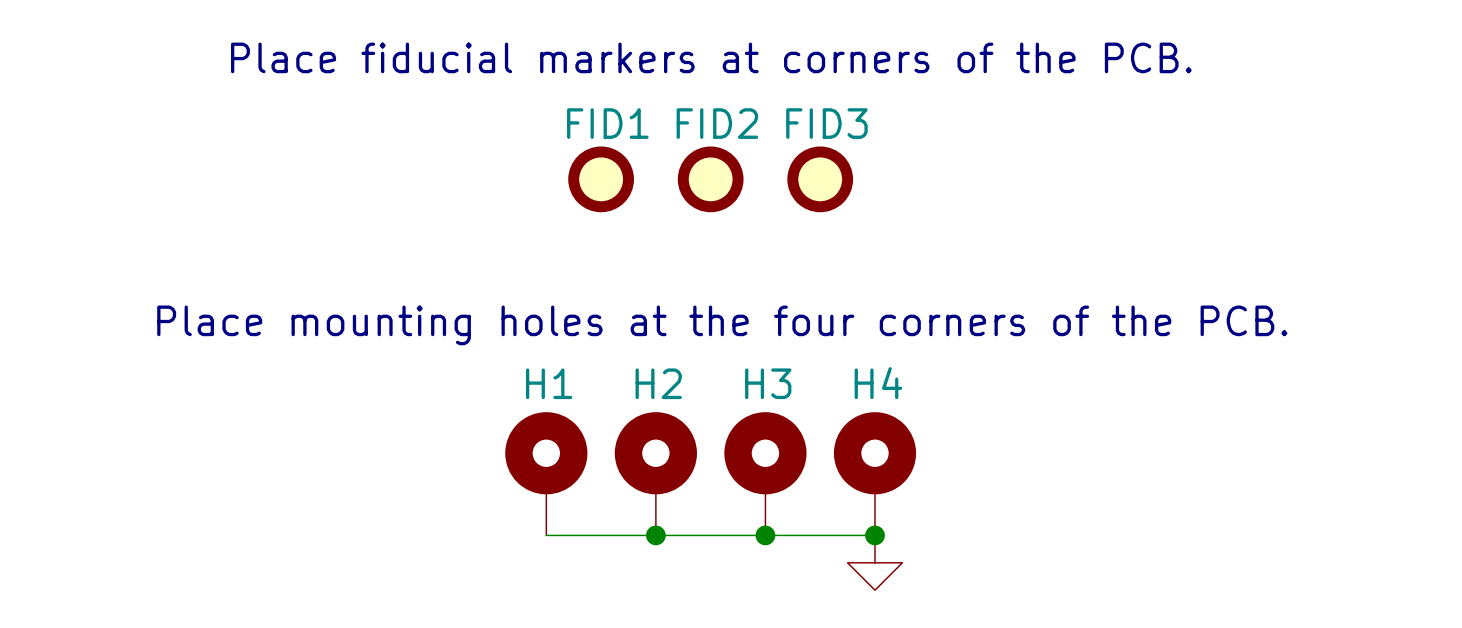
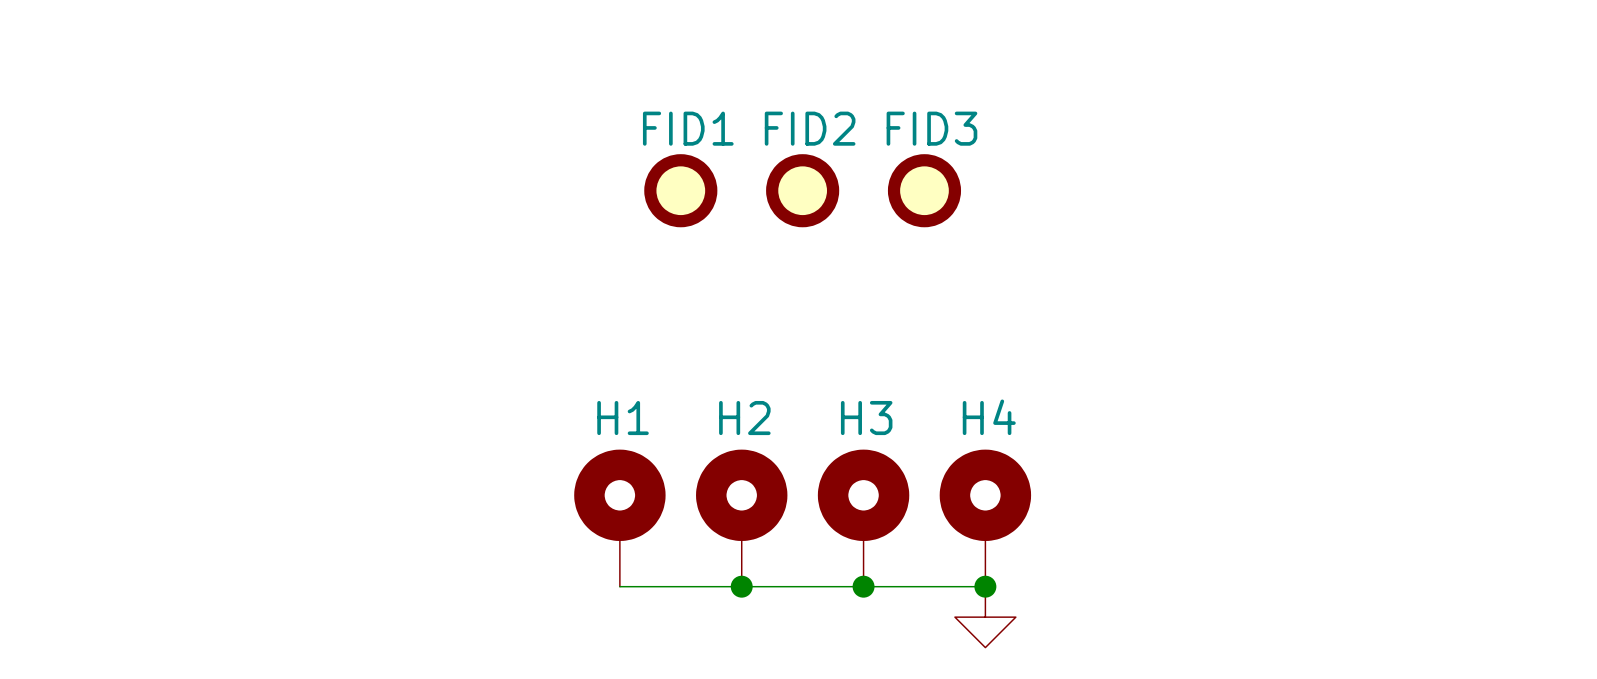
text: Place fiducial markers at corners of the PCB. (711, 57) -> none
text: Place mounting holes at the four corners of the PCB. (722, 325) -> none

